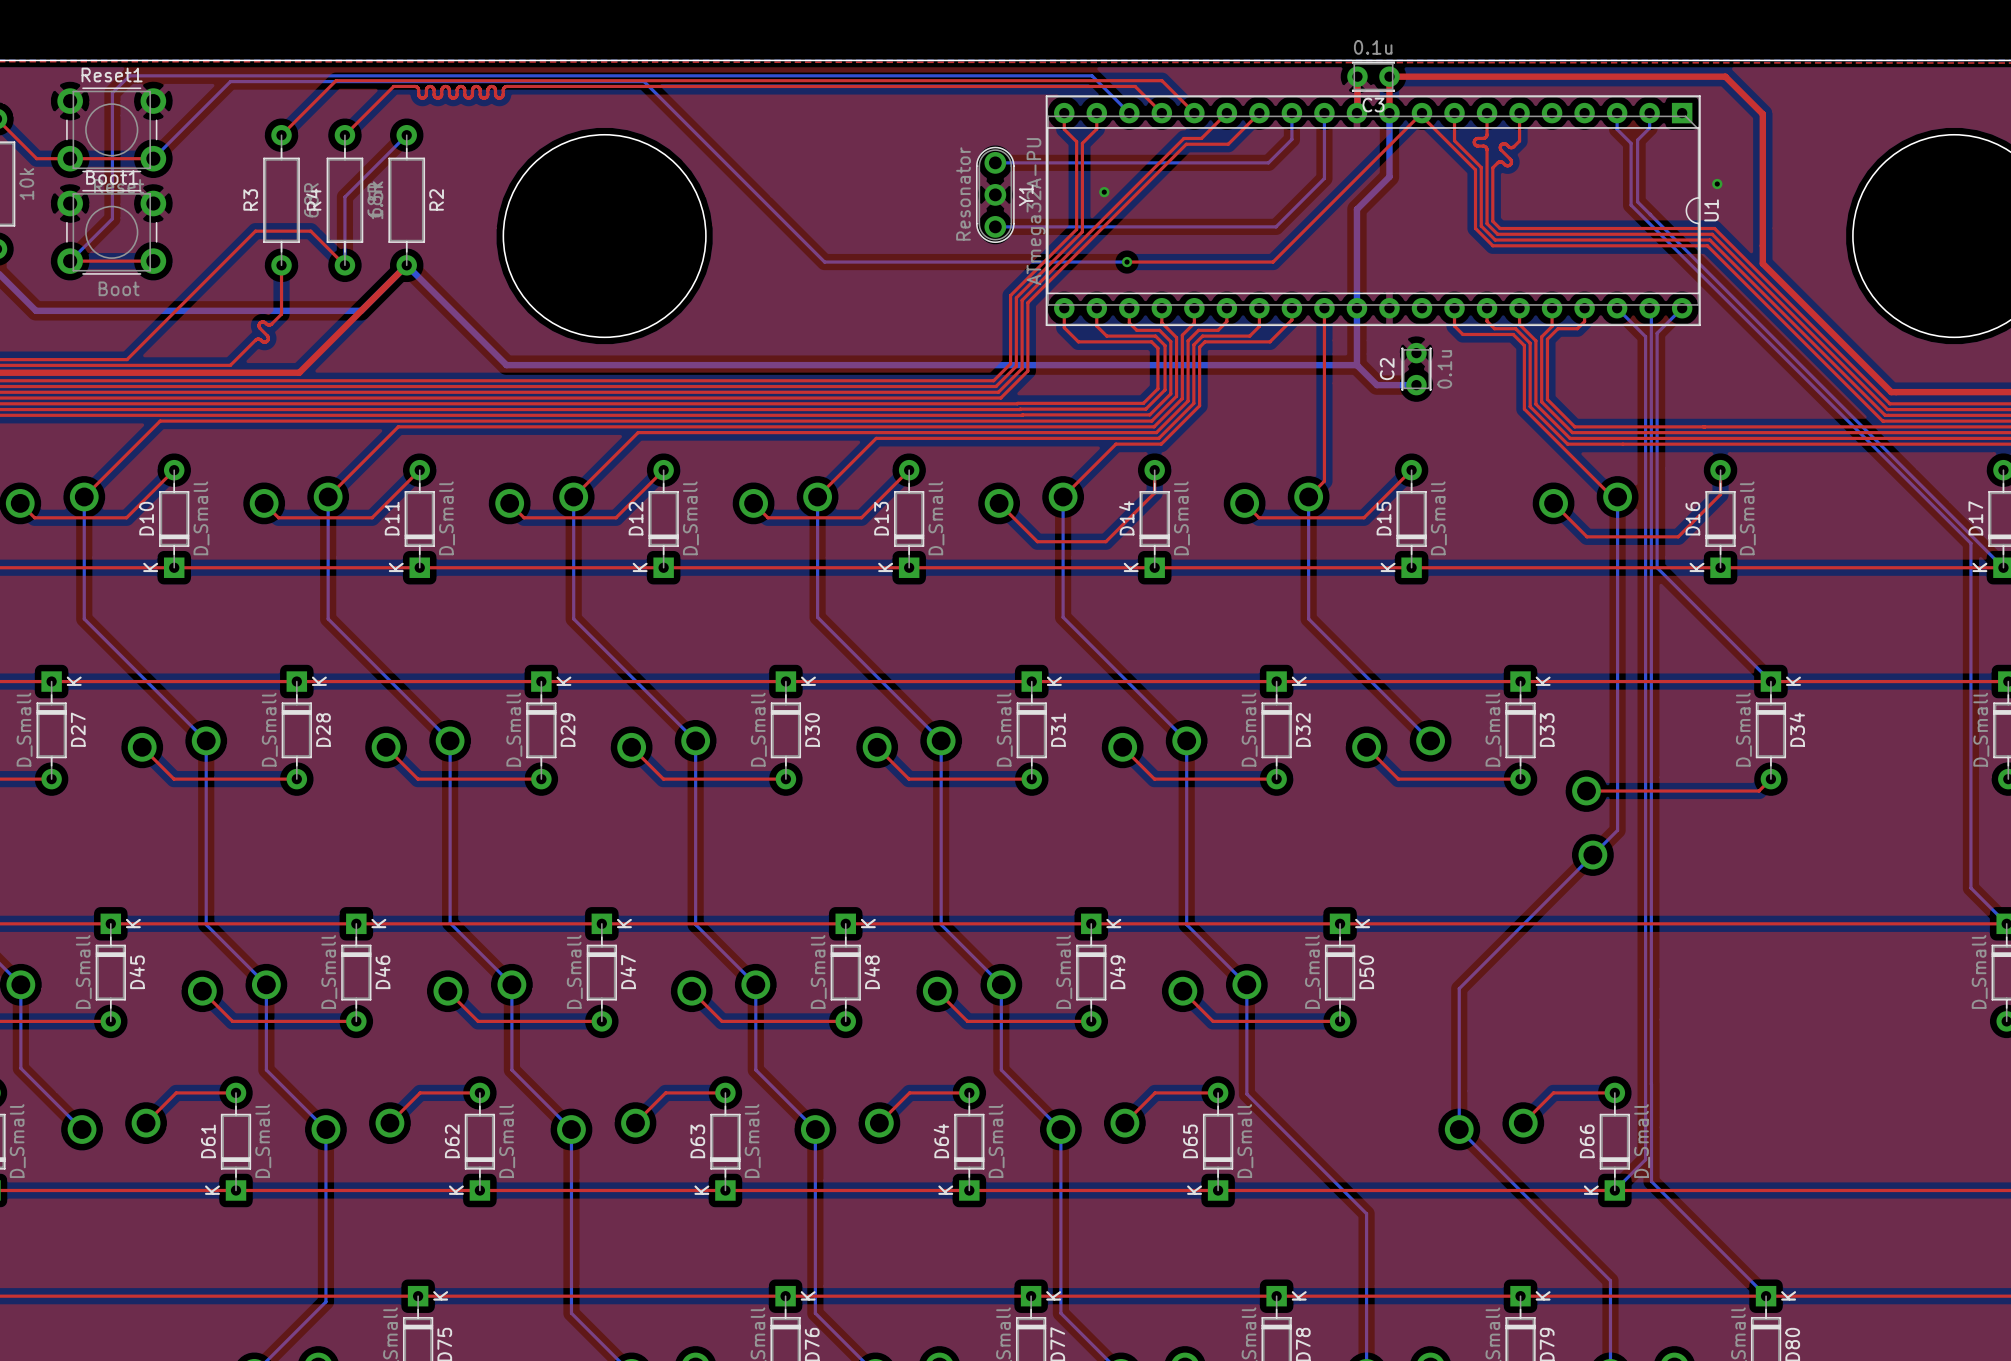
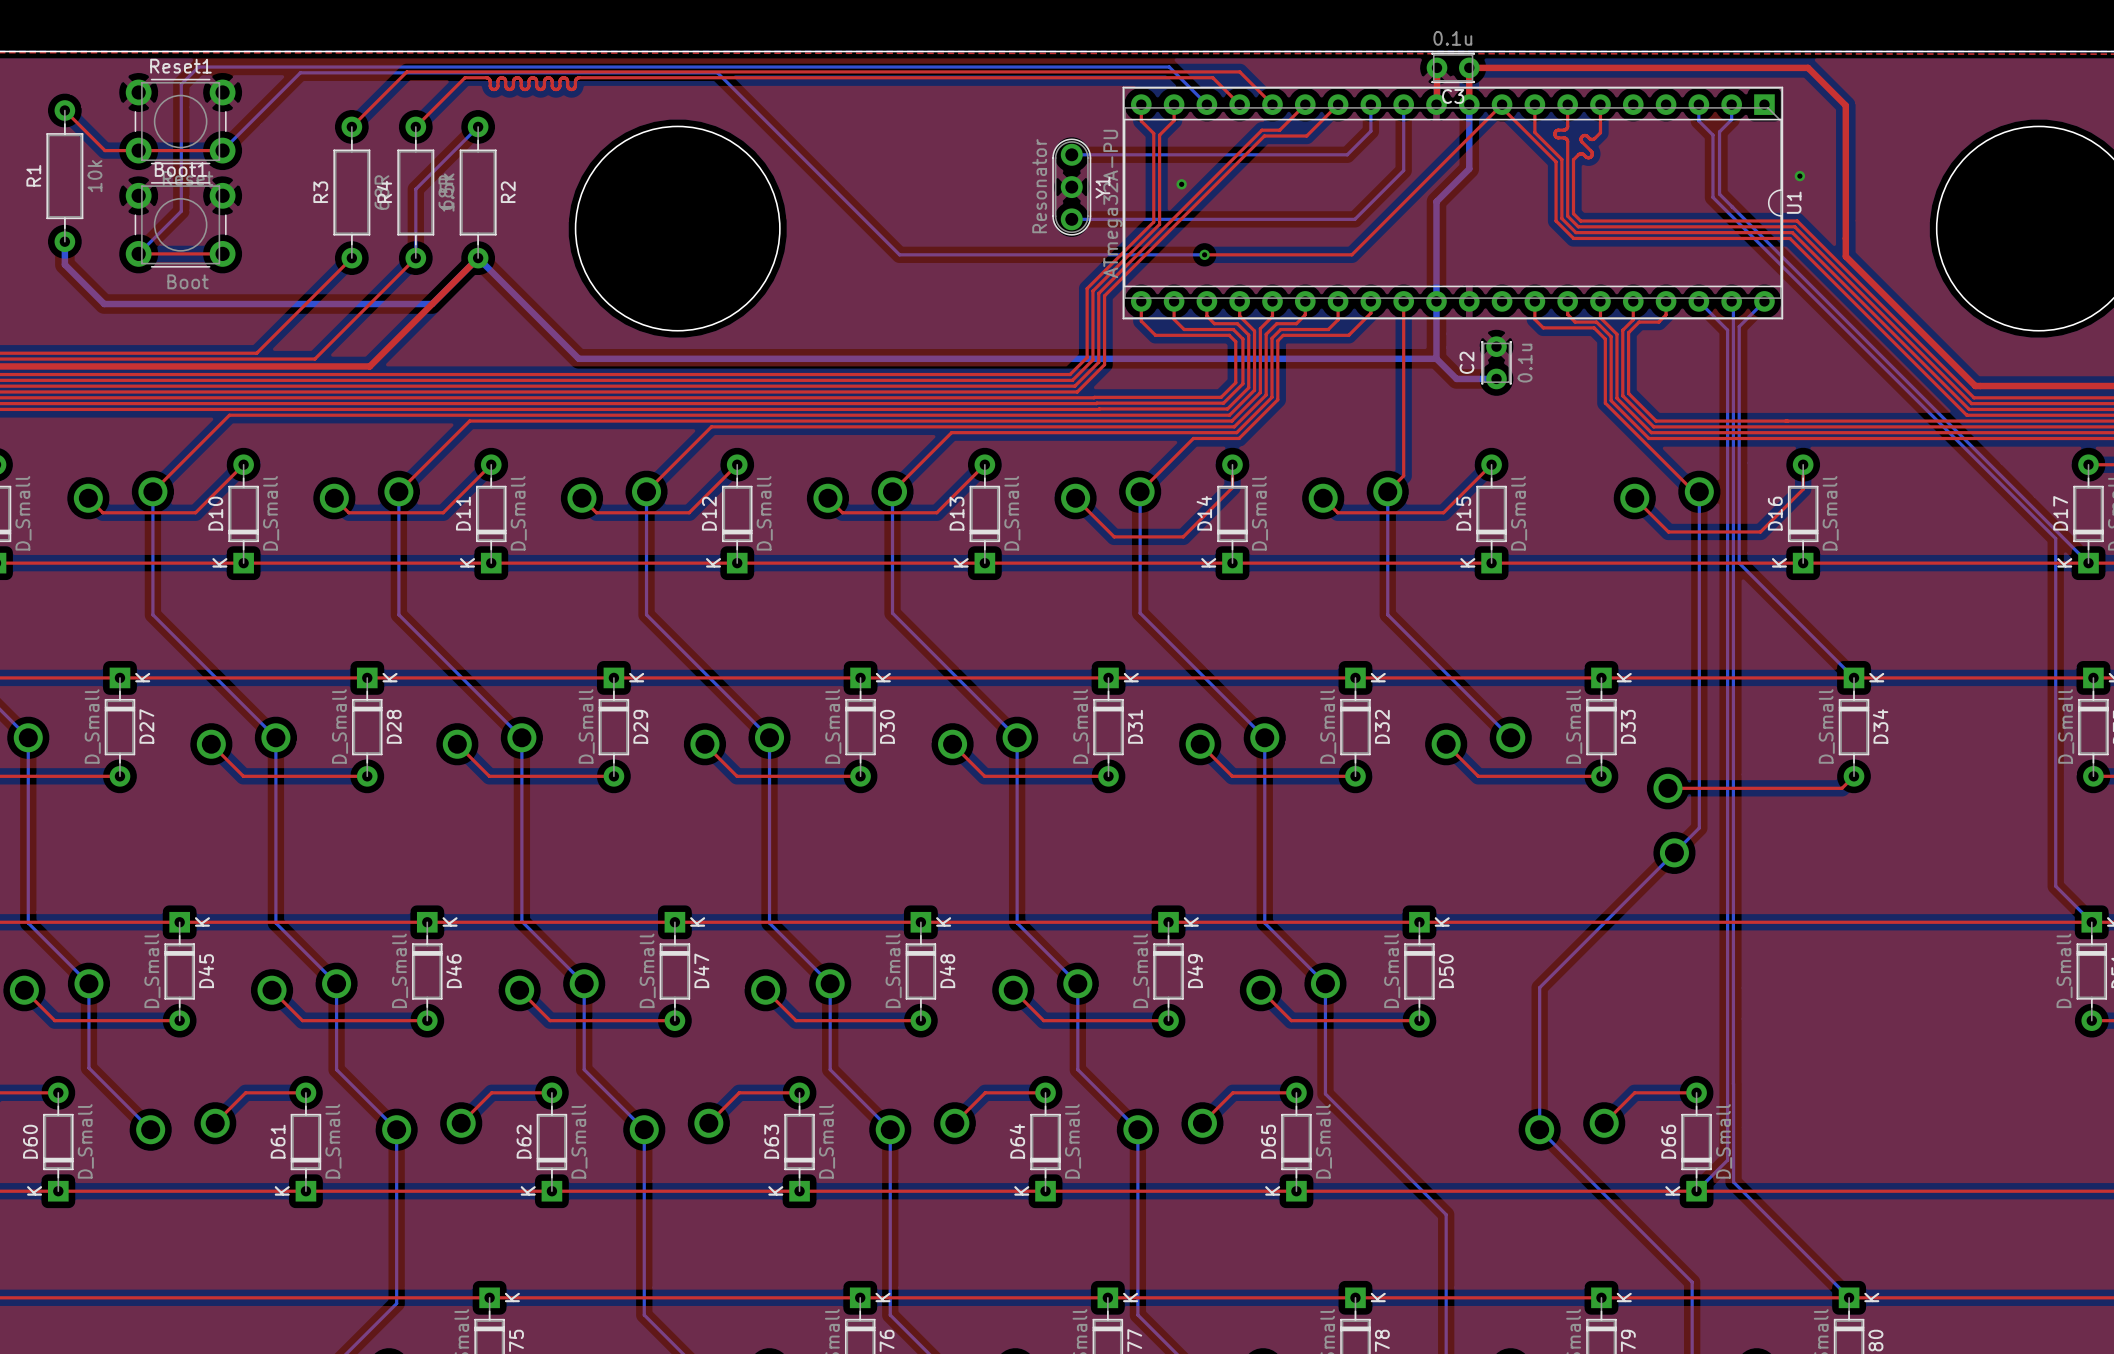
top track: (281, 265) (281, 314) (270, 324) (263, 321) (260, 323) (259, 327) (267, 336) (267, 340) (264, 342) (256, 339) (230, 365) -> (415, 258) (314, 359) (300, 359)
top track: (344, 265) (310, 231) (255, 231) (127, 359) -> (351, 258) (256, 353) (196, 353)

